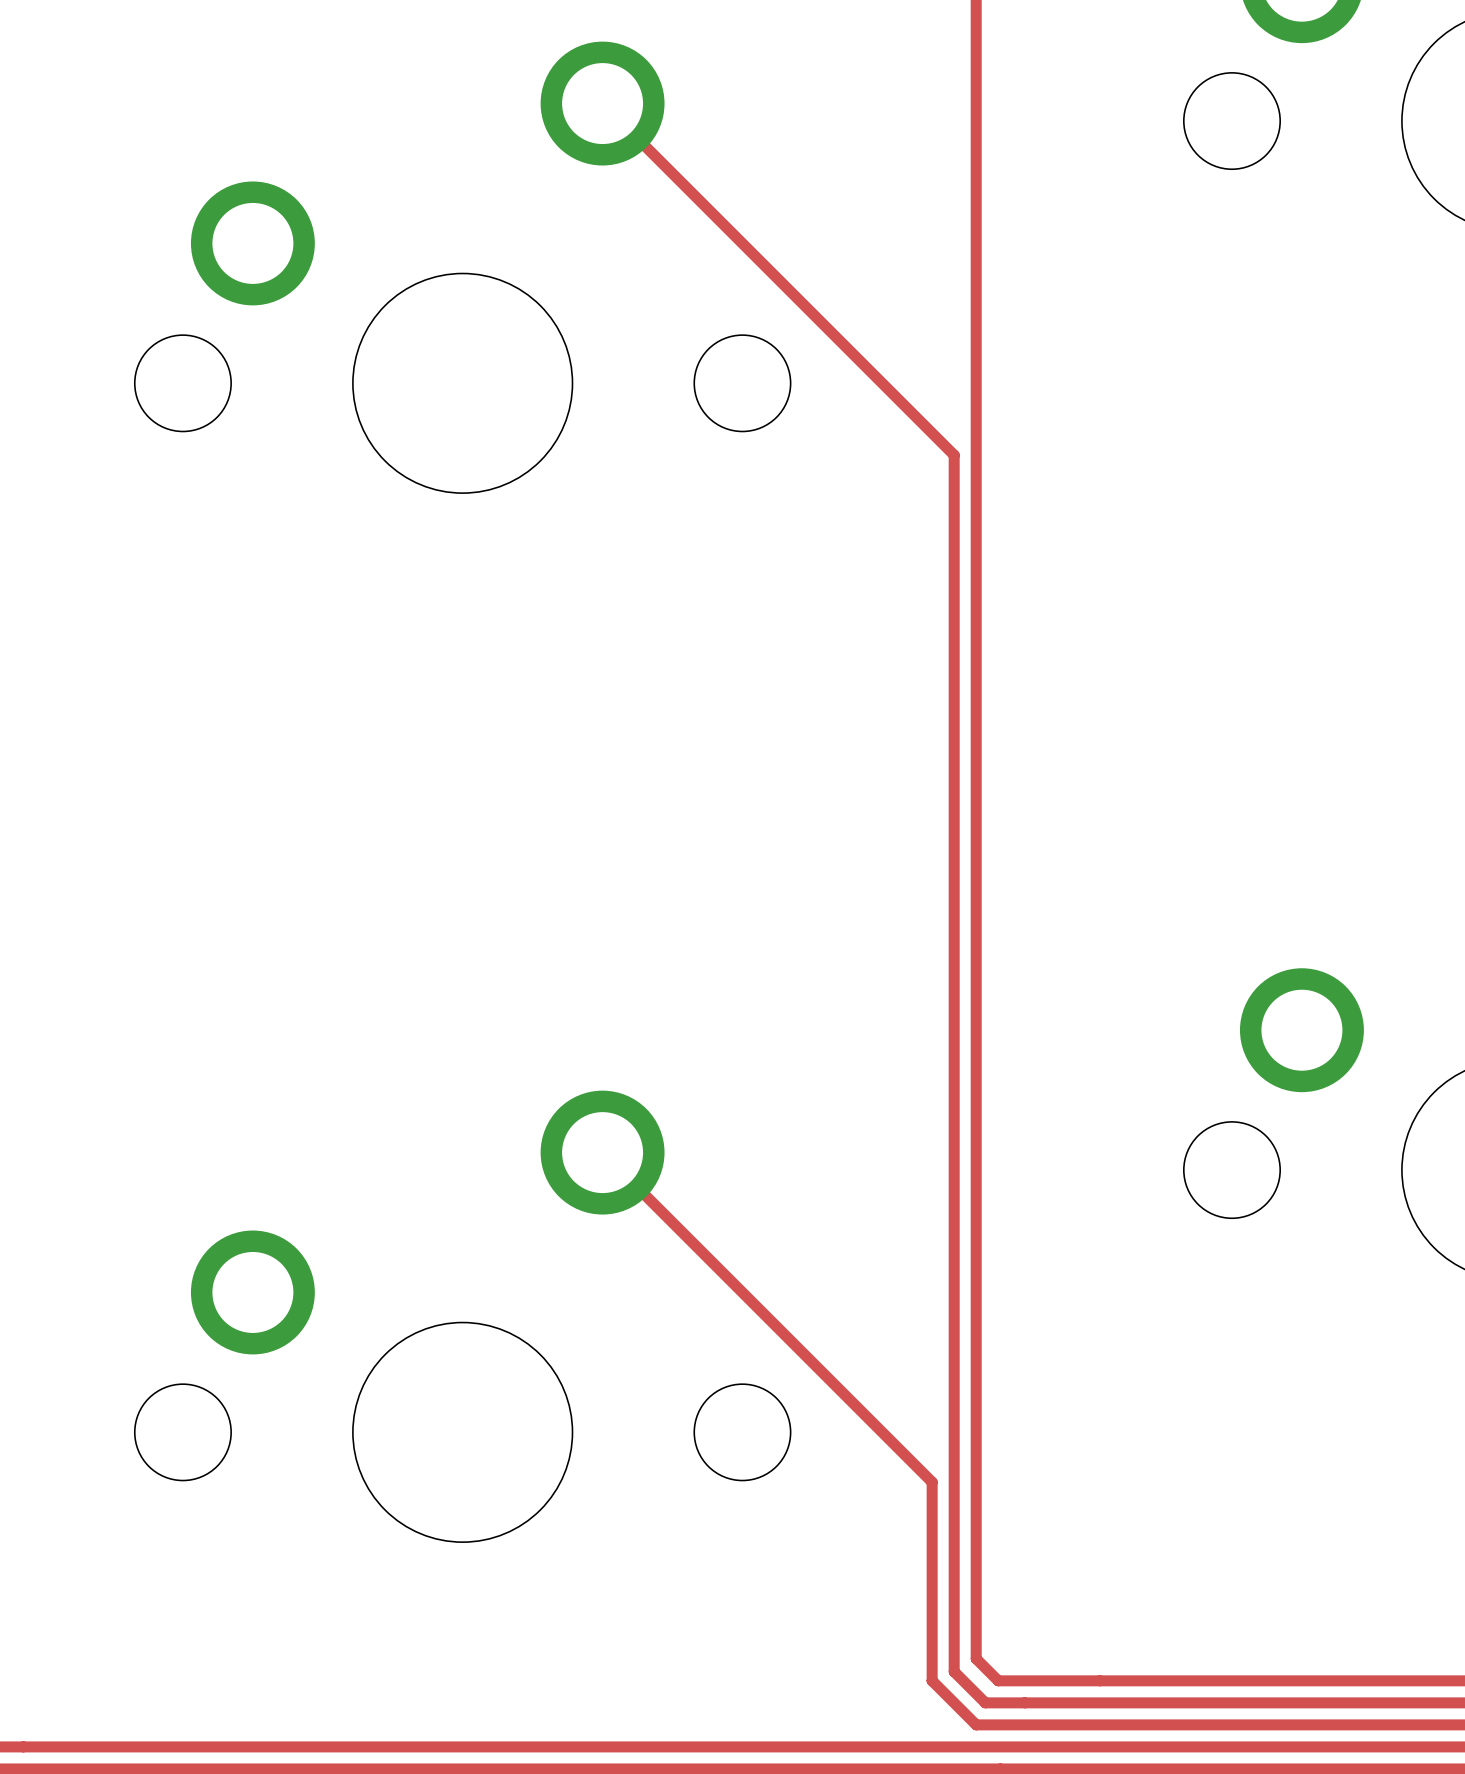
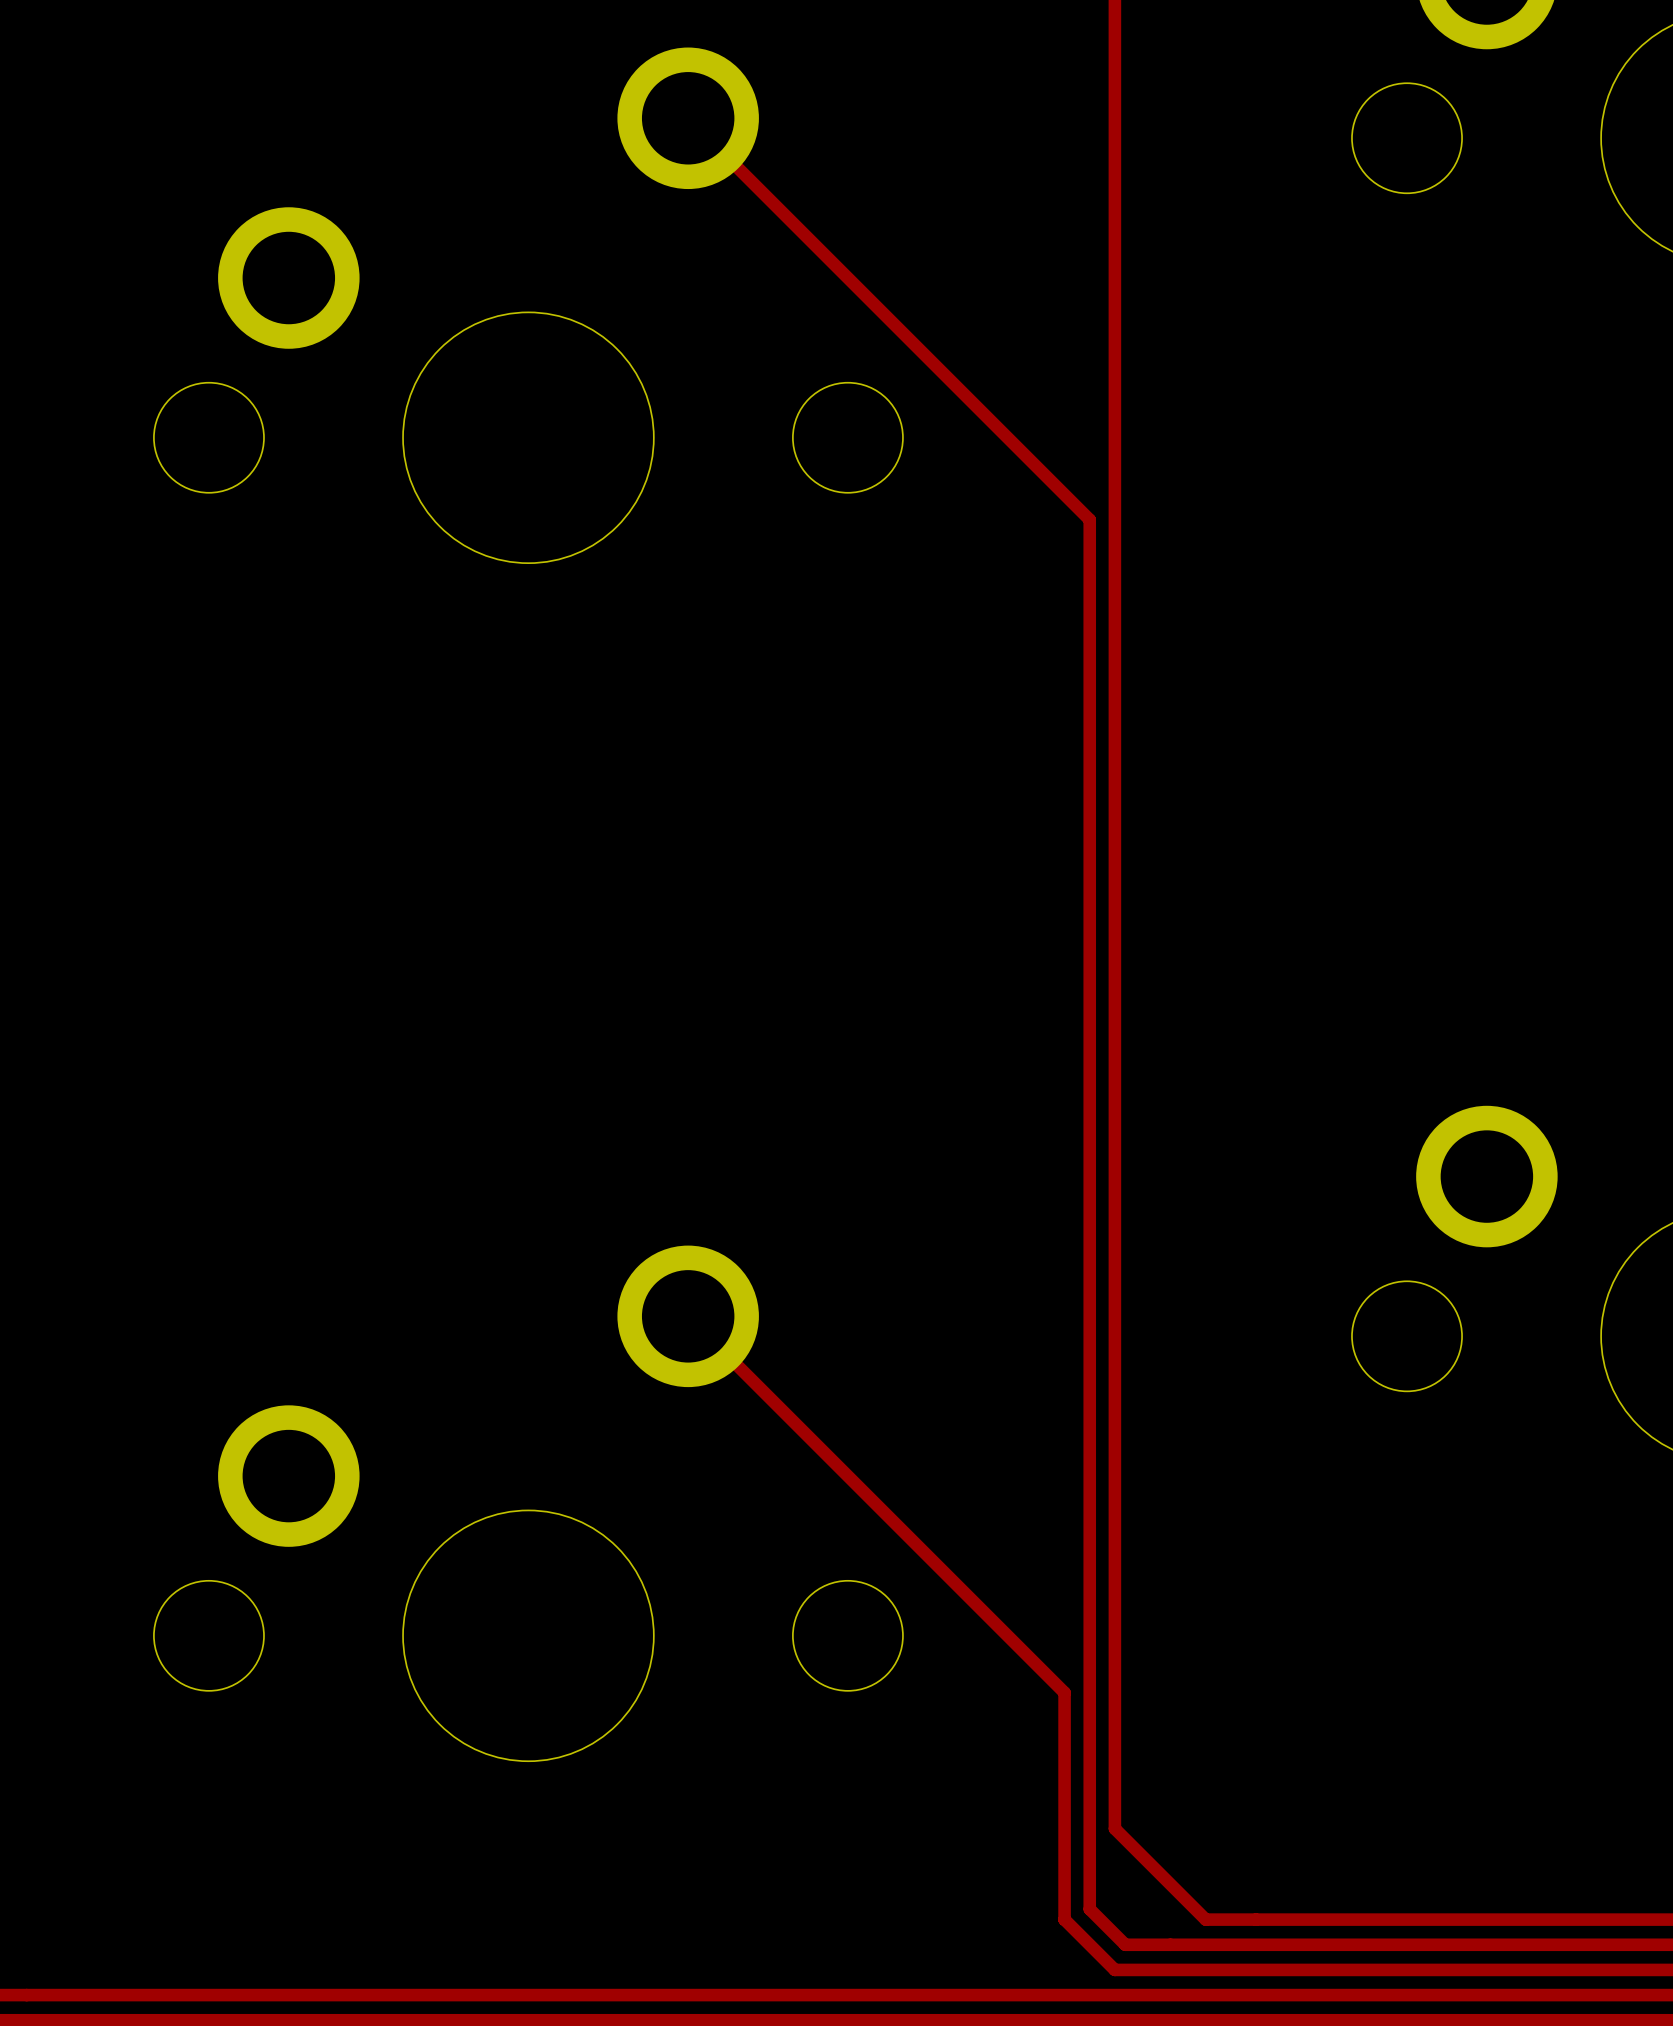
track: (976, 1601) (976, 1658) (998, 1680) (1055, 1680) -> (1114, 1828) (1205, 1919)

